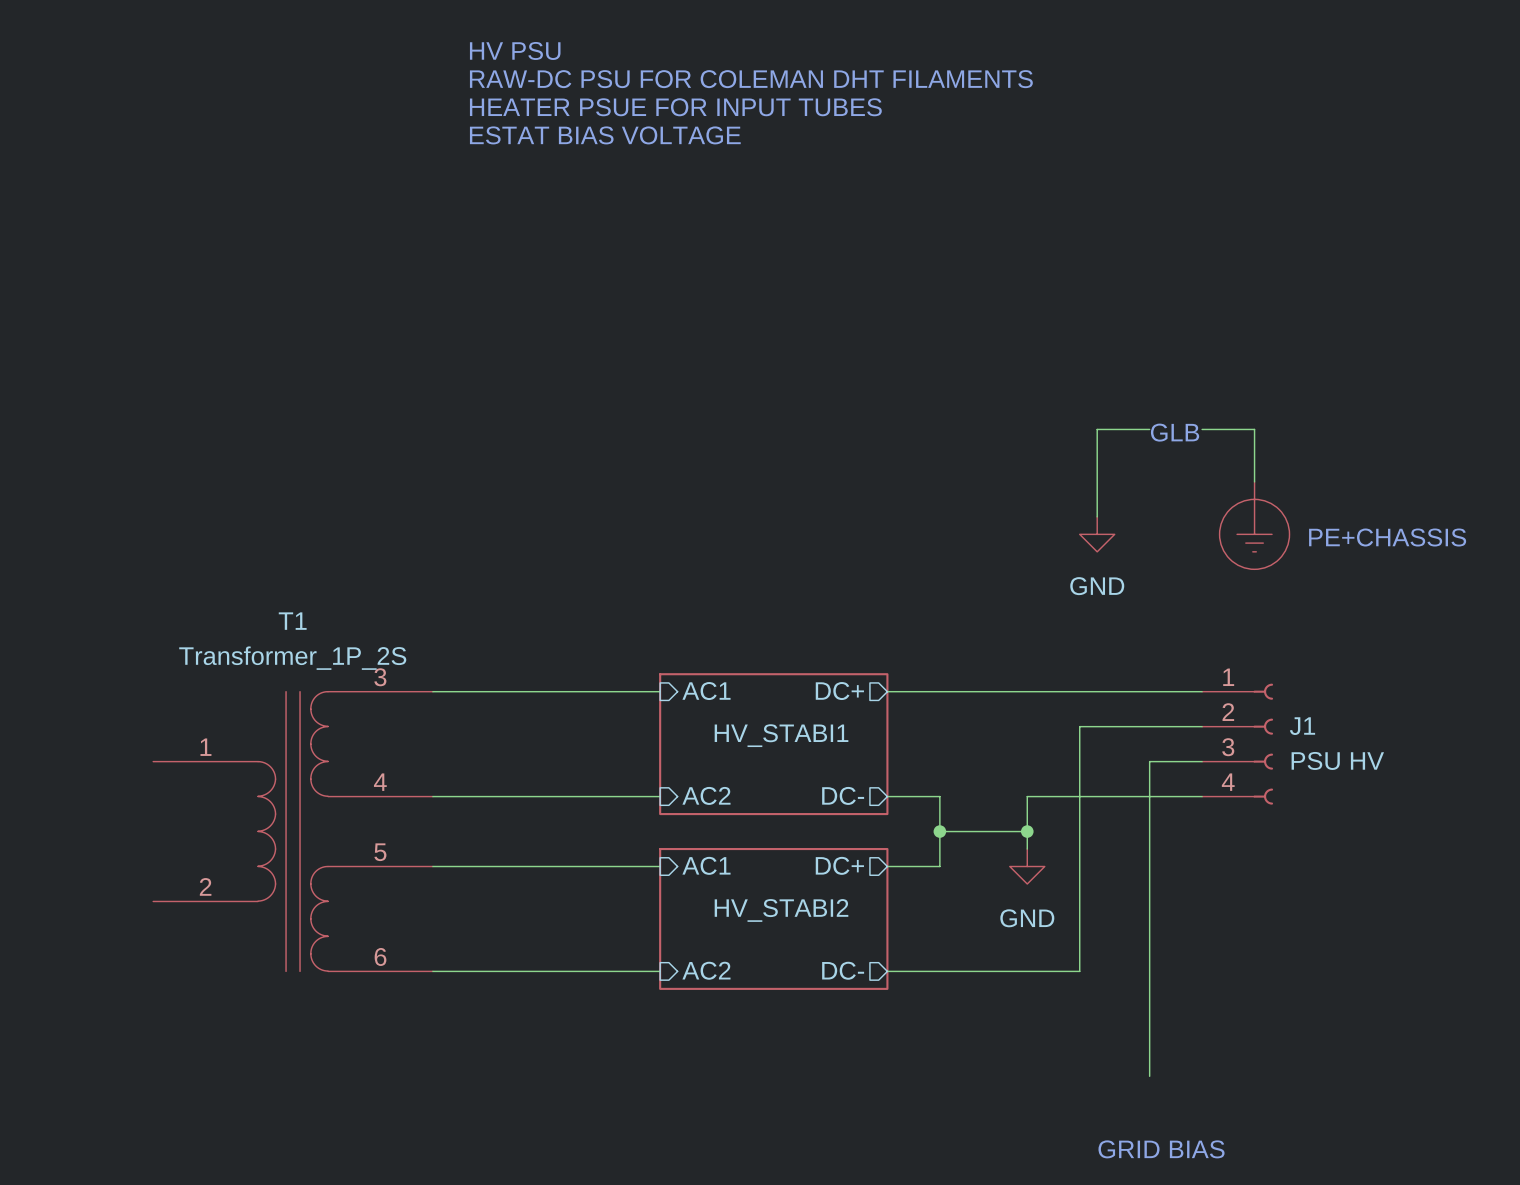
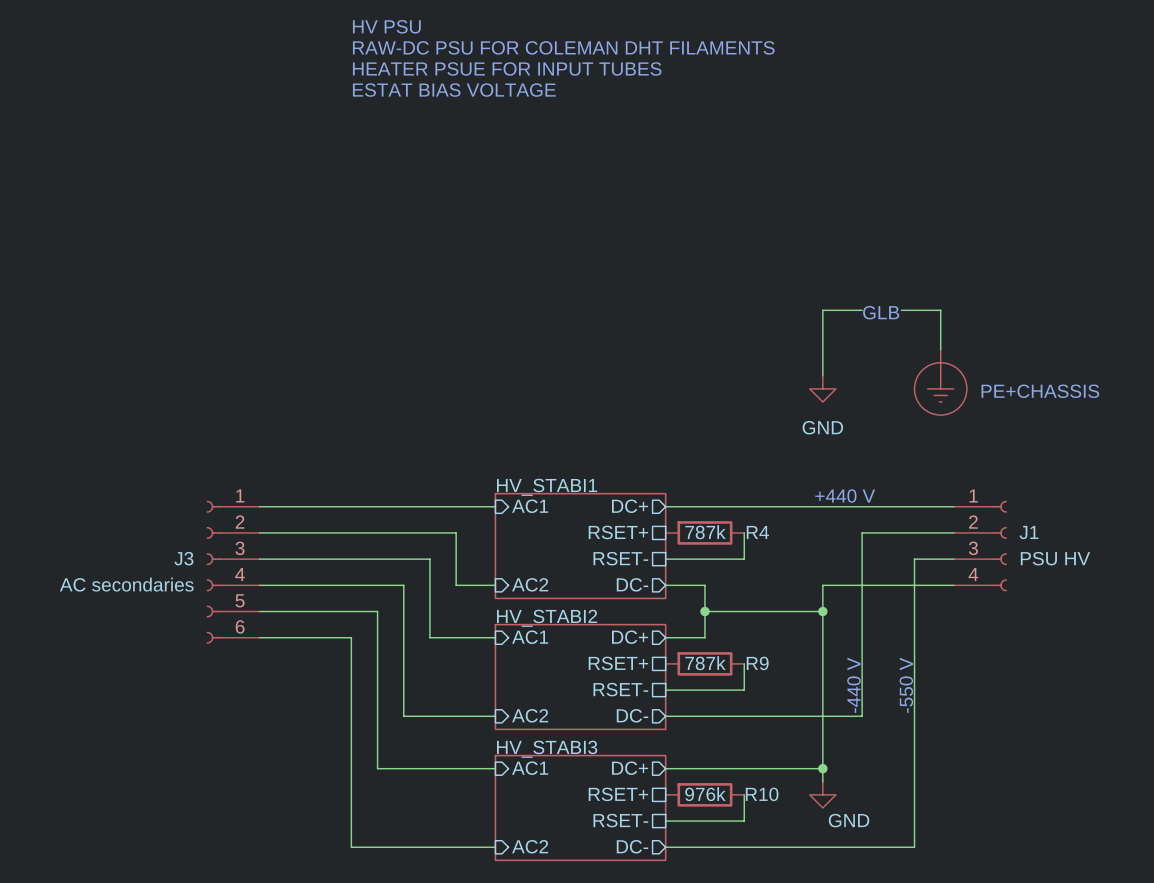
text: none -> +440 V (845, 496)
sheet pin: none -> RSET+ (618, 532)
wire: none -> (259, 532) (456, 532) (456, 585)
R4: none -> 787k (704, 532)
wire: none -> (744, 532) (744, 559) (665, 559)
wire: (1149, 726) (1079, 726) (1079, 971) -> none
sheet HV_STABI1 name position: HV_STABI1 (781, 735) -> HV_STABI1 (547, 487)
J1 position: (1237, 744) -> (980, 546)
sheet pin: none -> RSET- (620, 558)
wire: (1149, 761) (1202, 761) -> (862, 559) (862, 532)
wire: none -> (953, 559) (914, 559) (914, 847) (665, 847)
J3: none -> AC secondaries (233, 572)
wire: (537, 796) (607, 796) -> (403, 585) (403, 716)
wire: (1097, 796) (1027, 796) (1027, 849) -> (822, 585) (822, 781)
T1: Transformer_1P_2S (293, 831) -> none
wire: none -> (259, 611) (377, 611) (377, 768) (495, 768)
wire: none -> (770, 611) (822, 611)
junction position: (1027, 831) -> (822, 611)
wire: (467, 866) (572, 866) -> (259, 559) (429, 559) (429, 637)
wire: none -> (351, 637) (351, 847) (495, 847)
power symbol position: GND (1027, 866) -> GND (822, 794)
sheet pin: none -> RSET+ (618, 663)
R9: none -> 787k (704, 663)
wire: none -> (744, 663) (744, 690) (665, 690)
sheet HV_STABI2 name position: HV_STABI2 (781, 910) -> HV_STABI2 (547, 618)
power symbol text position: GND (1027, 918) -> GND (849, 820)
text: none -> -440 V (853, 685)
text: none -> -550 V (906, 685)
sheet pin: none -> RSET- (620, 689)
wire: (432, 971) (537, 971) -> none
wire: (1149, 971) (1149, 1076) -> (862, 716) (809, 716)
sheet pin: none -> AC1 (530, 768)
sheet pin: none -> DC+ (630, 768)
wire: none -> (665, 768) (822, 768)
junction: none -> (822, 768)
sheet pin: none -> RSET+ (618, 794)
R10: none -> 976k (704, 794)
wire: none -> (744, 794) (744, 821) (665, 821)
sheet HV_STABI3: none -> (580, 807)
sheet pin: none -> RSET- (620, 820)
sheet pin: none -> AC2 (530, 846)
sheet pin: none -> DC- (632, 846)
text: GRID BIAS (1161, 1149) -> none

